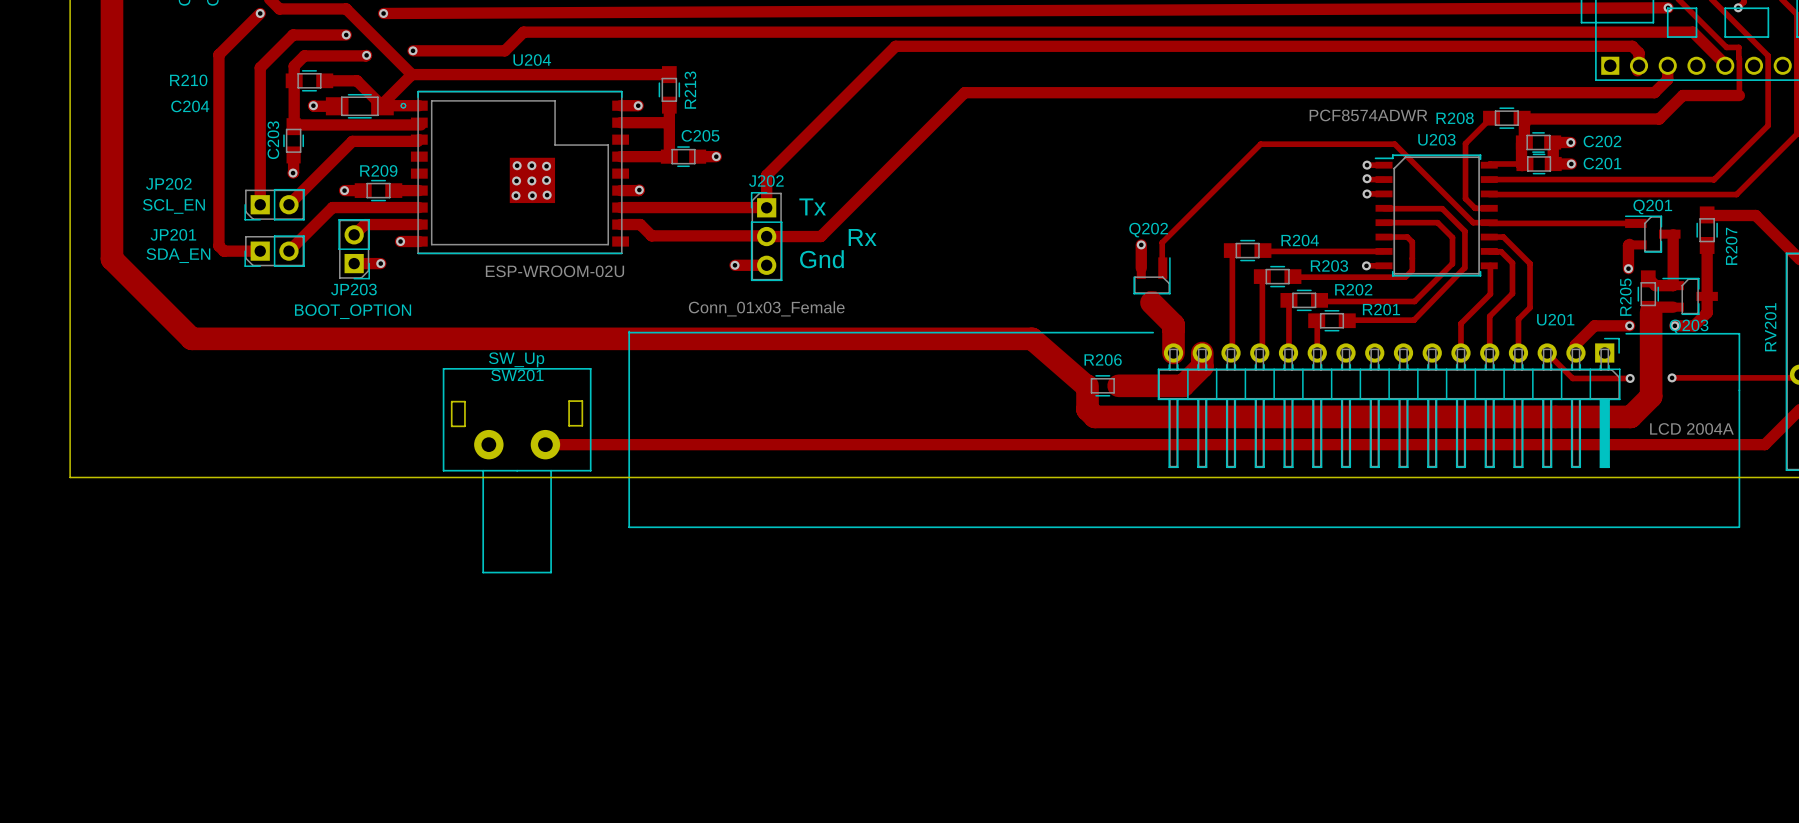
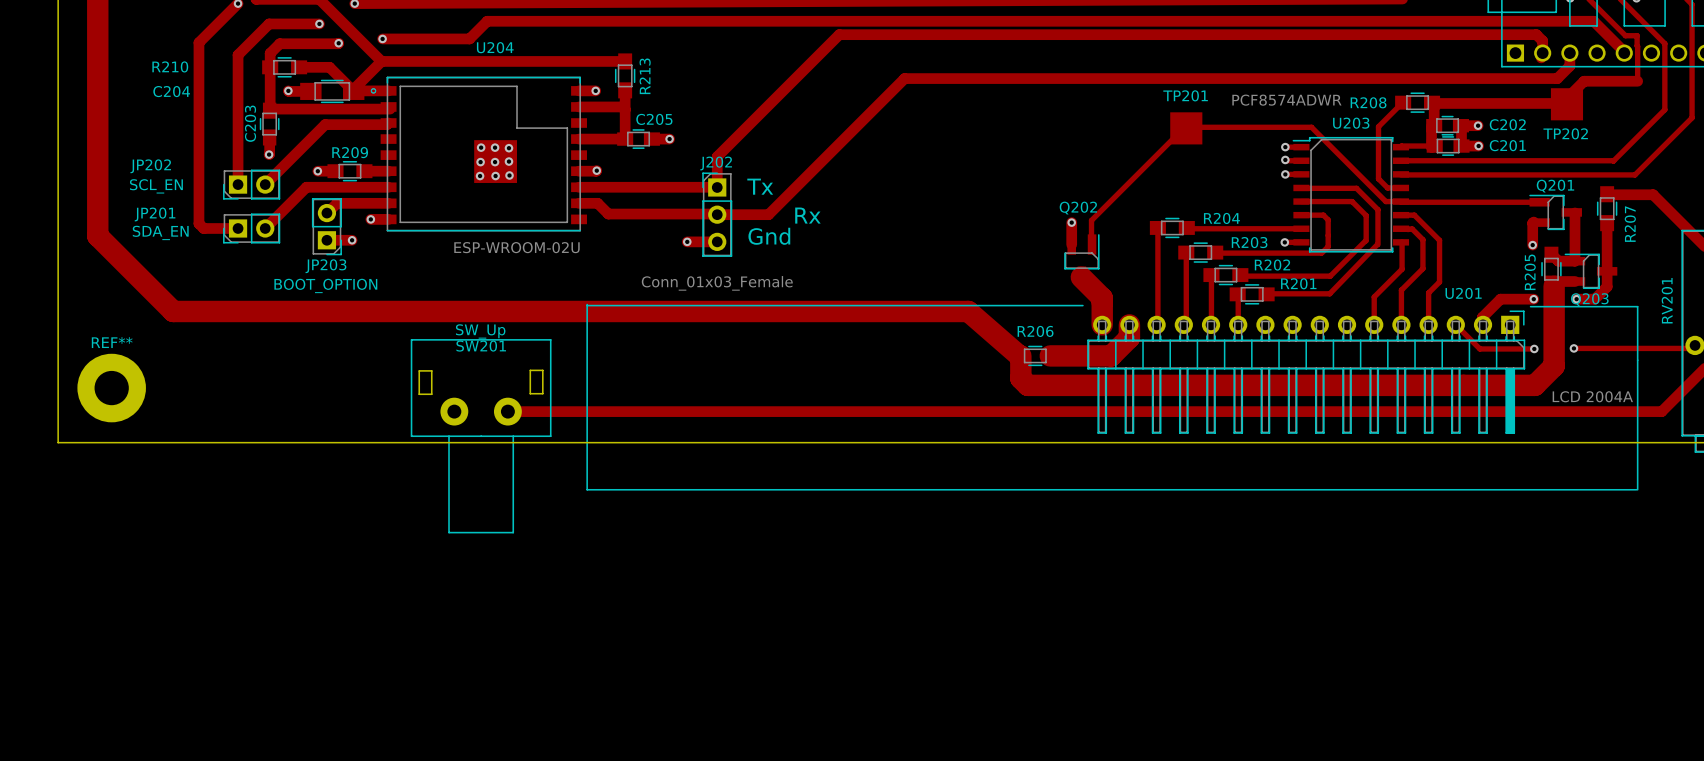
TP202: none -> (1566, 104)
TP201: none -> (1186, 128)
REF**: none -> (111, 388)

